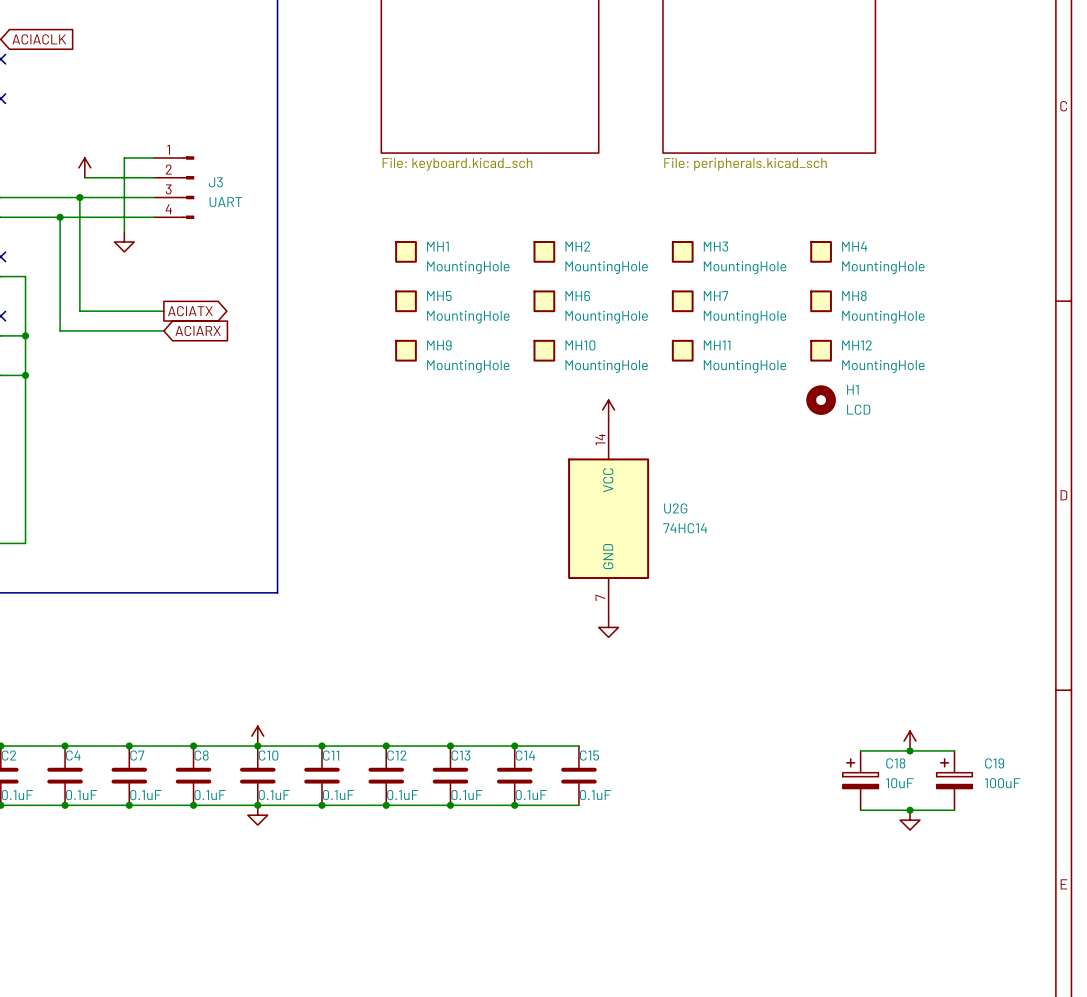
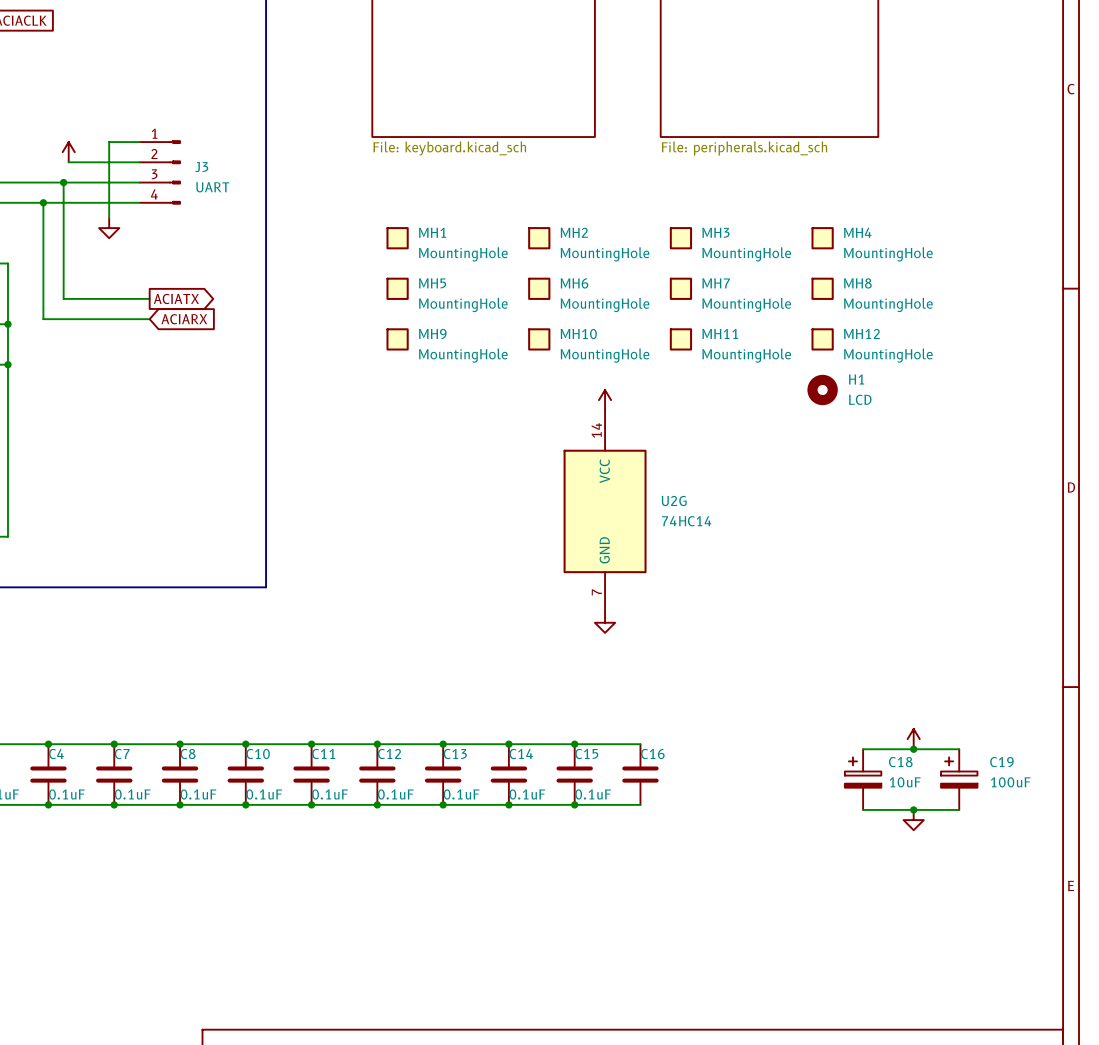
power symbol: (257, 736) -> none
wire: none -> (574, 744) (640, 744)
junction: none -> (574, 744)
C16: none -> (640, 774)
wire: none -> (574, 804) (640, 804)
junction: none -> (574, 804)
power symbol: (257, 815) -> none

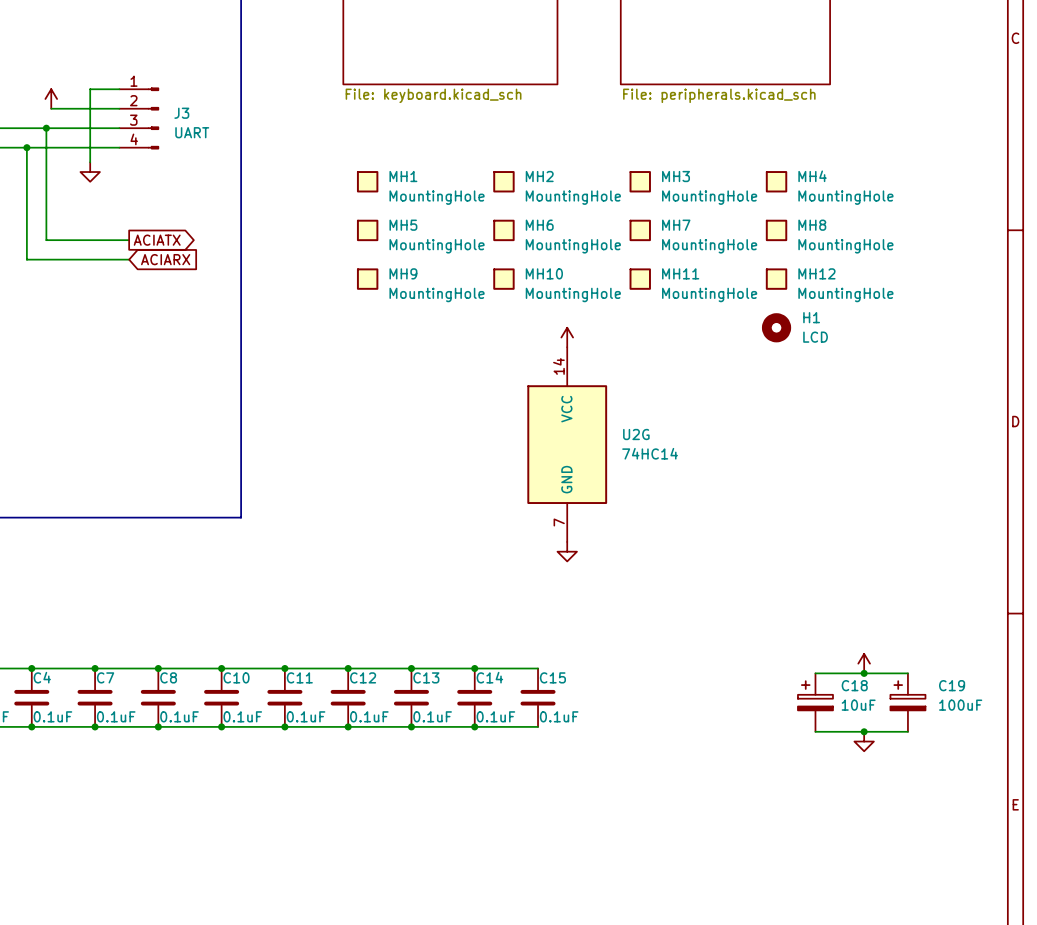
wire: (574, 744) (640, 744) -> none
junction: (574, 744) -> none
C16: (640, 774) -> none
wire: (574, 804) (640, 804) -> none
junction: (574, 804) -> none

